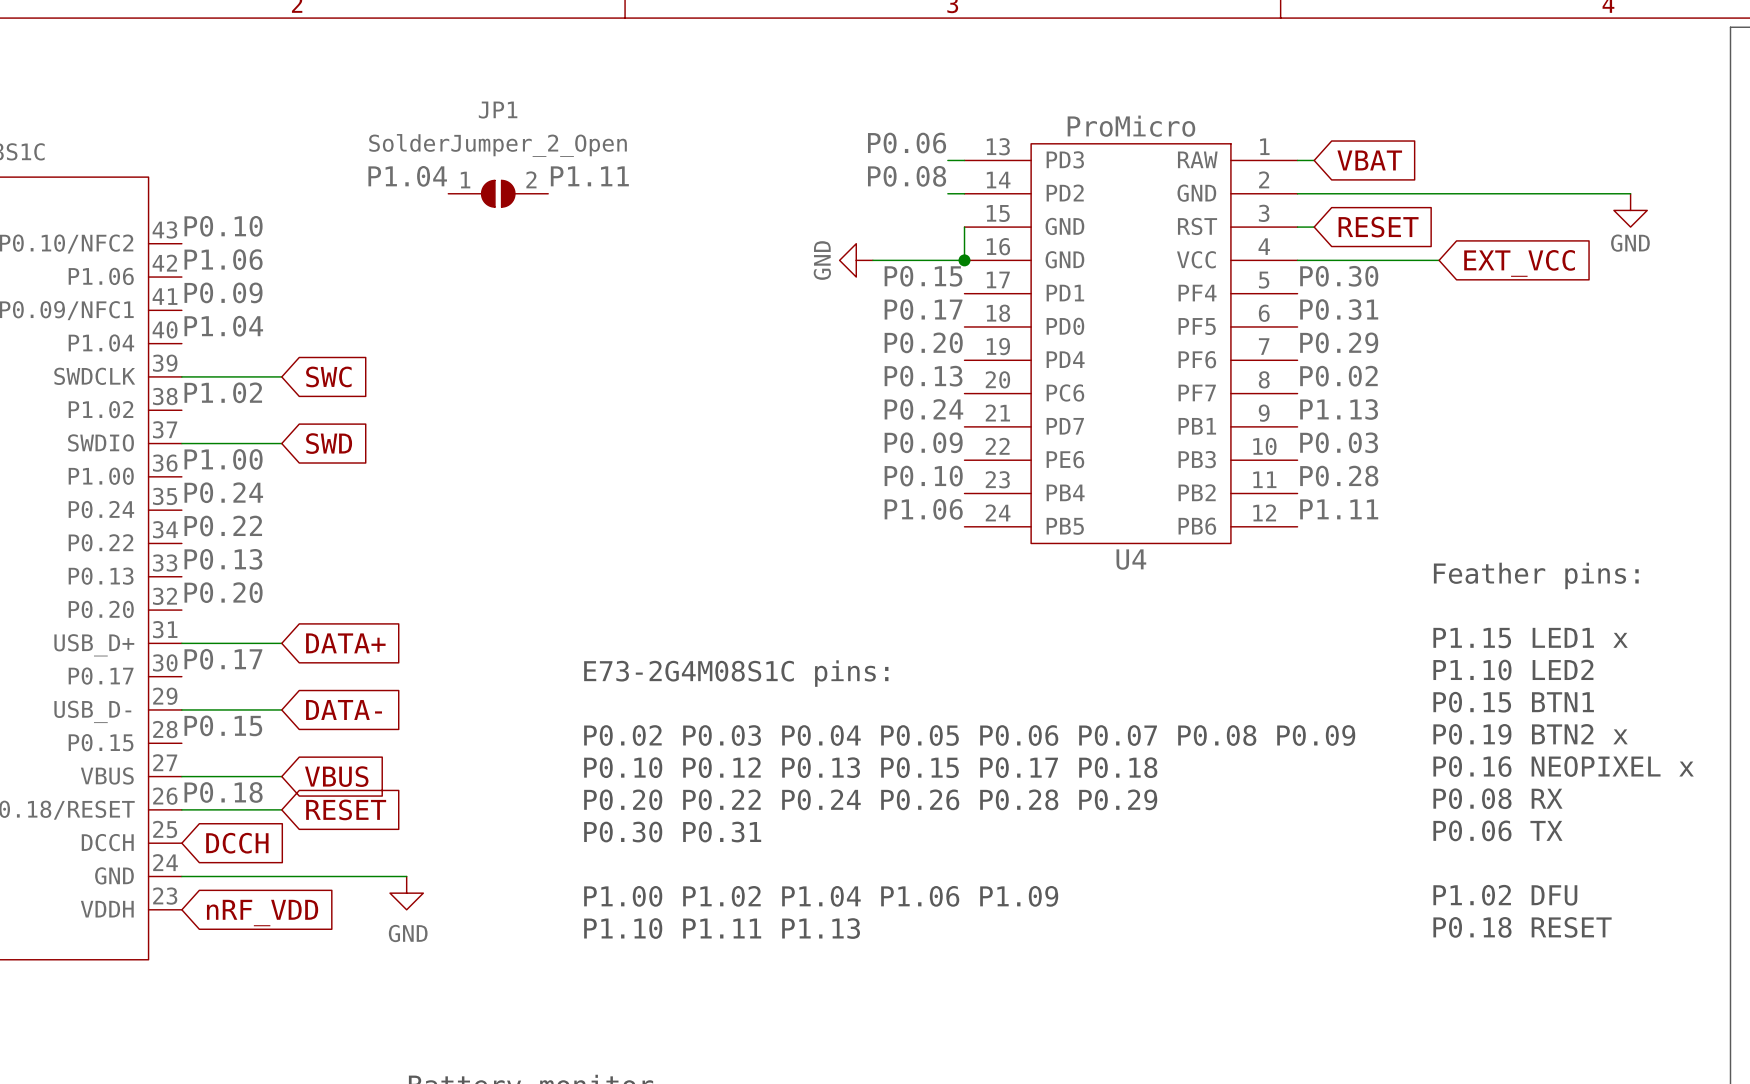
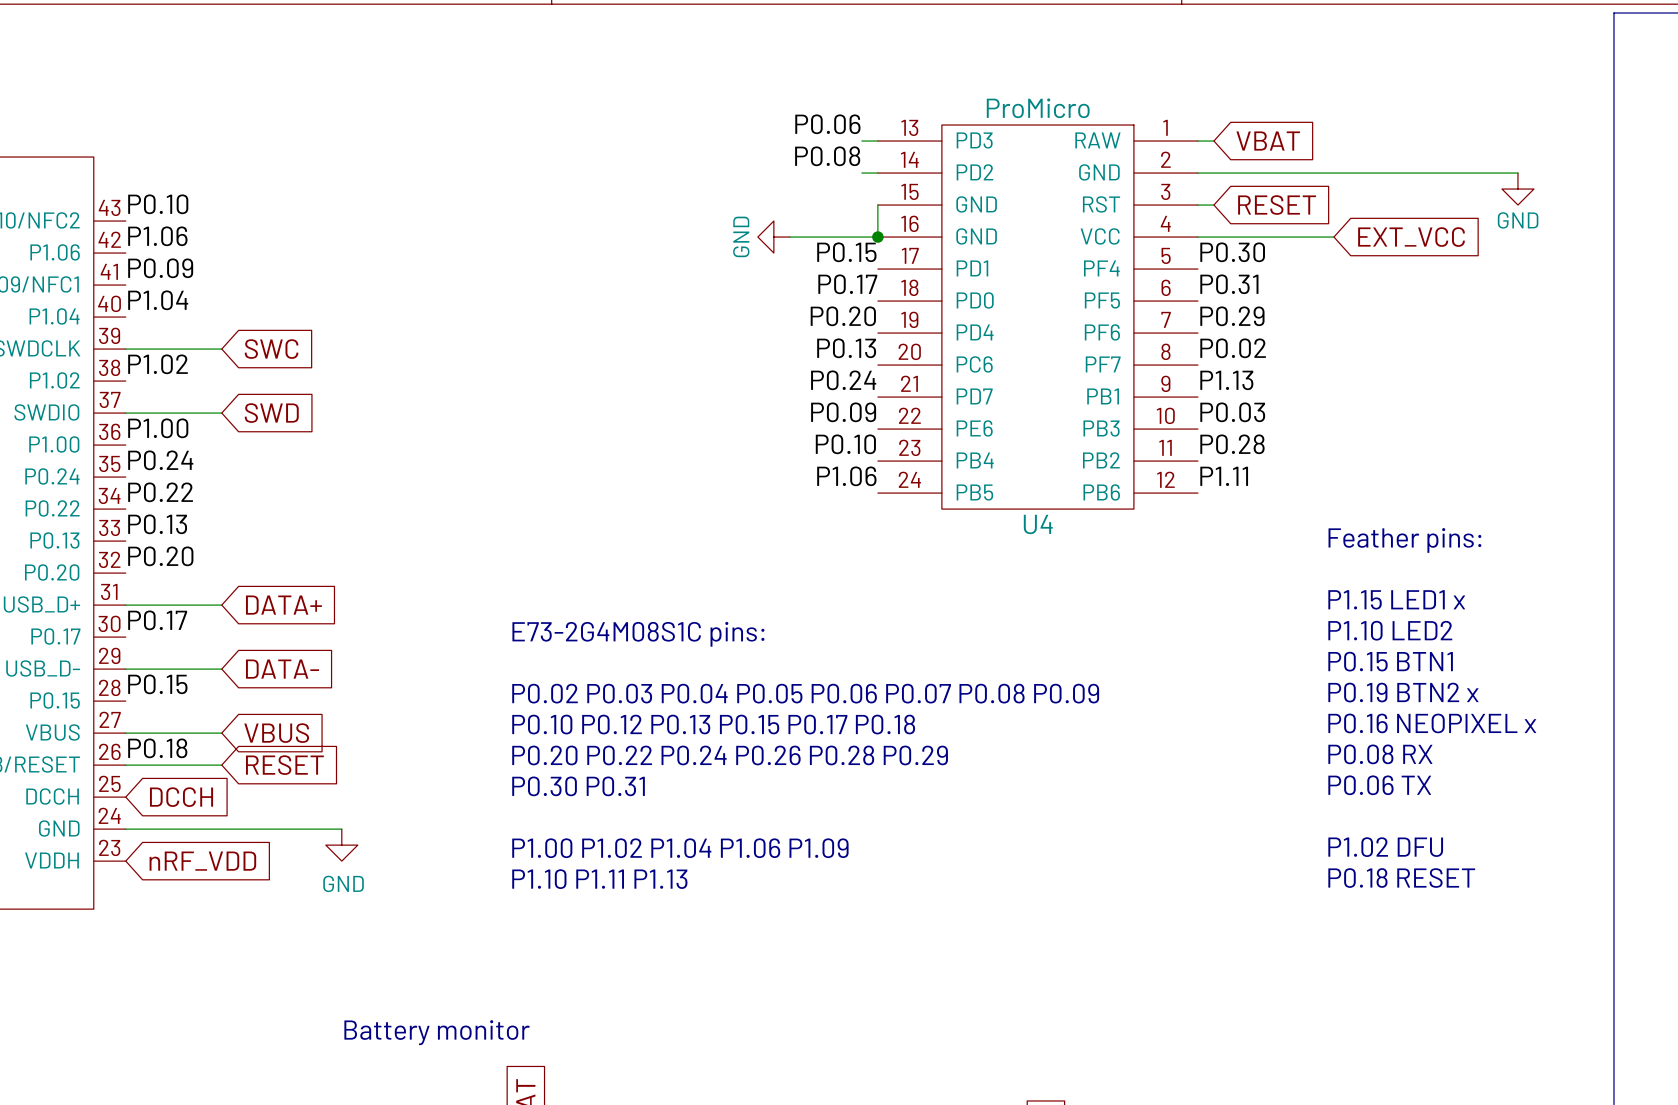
label: P1.04 (407, 176) -> none
label: P1.11 (589, 176) -> none
JP1: SolderJumper_2_Open (498, 193) -> none

